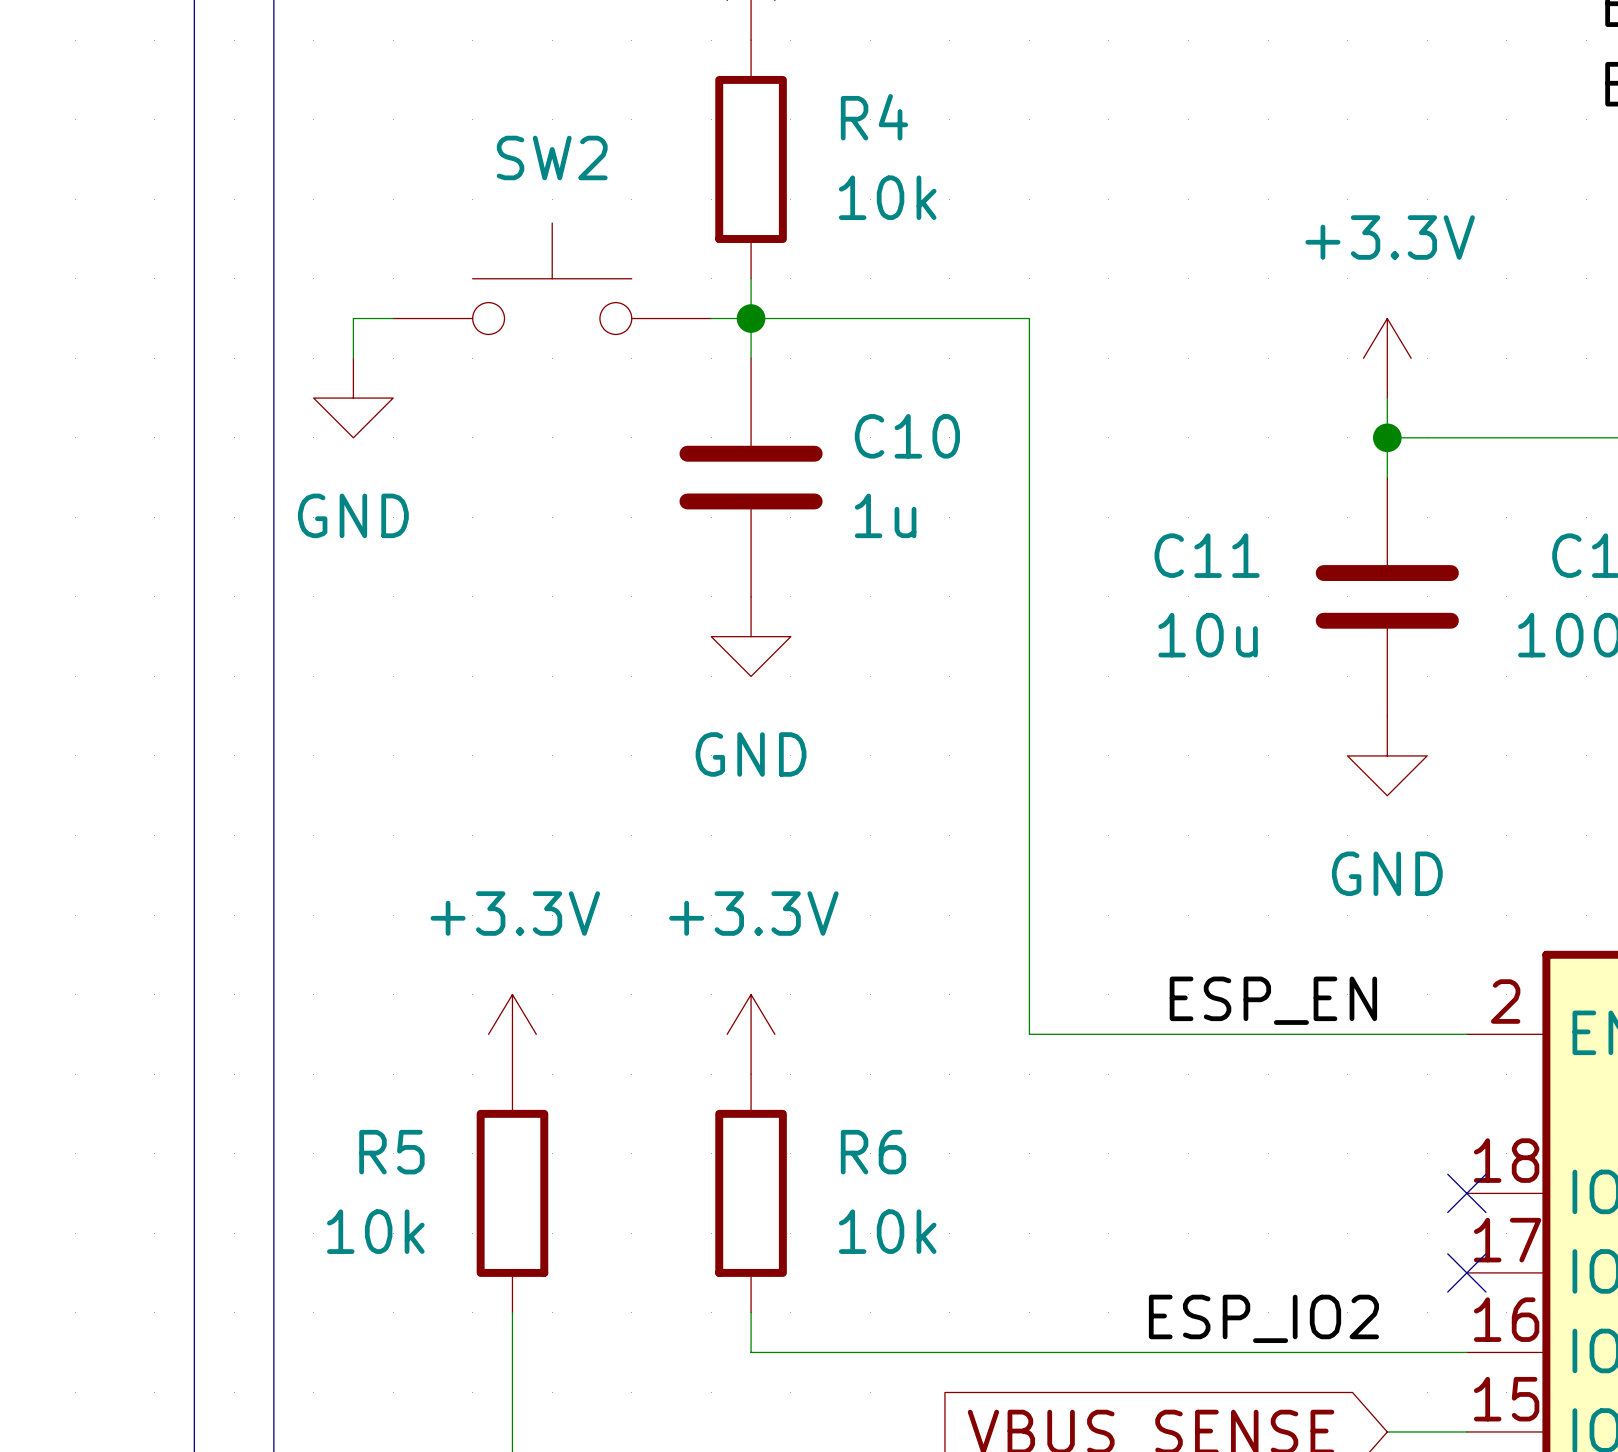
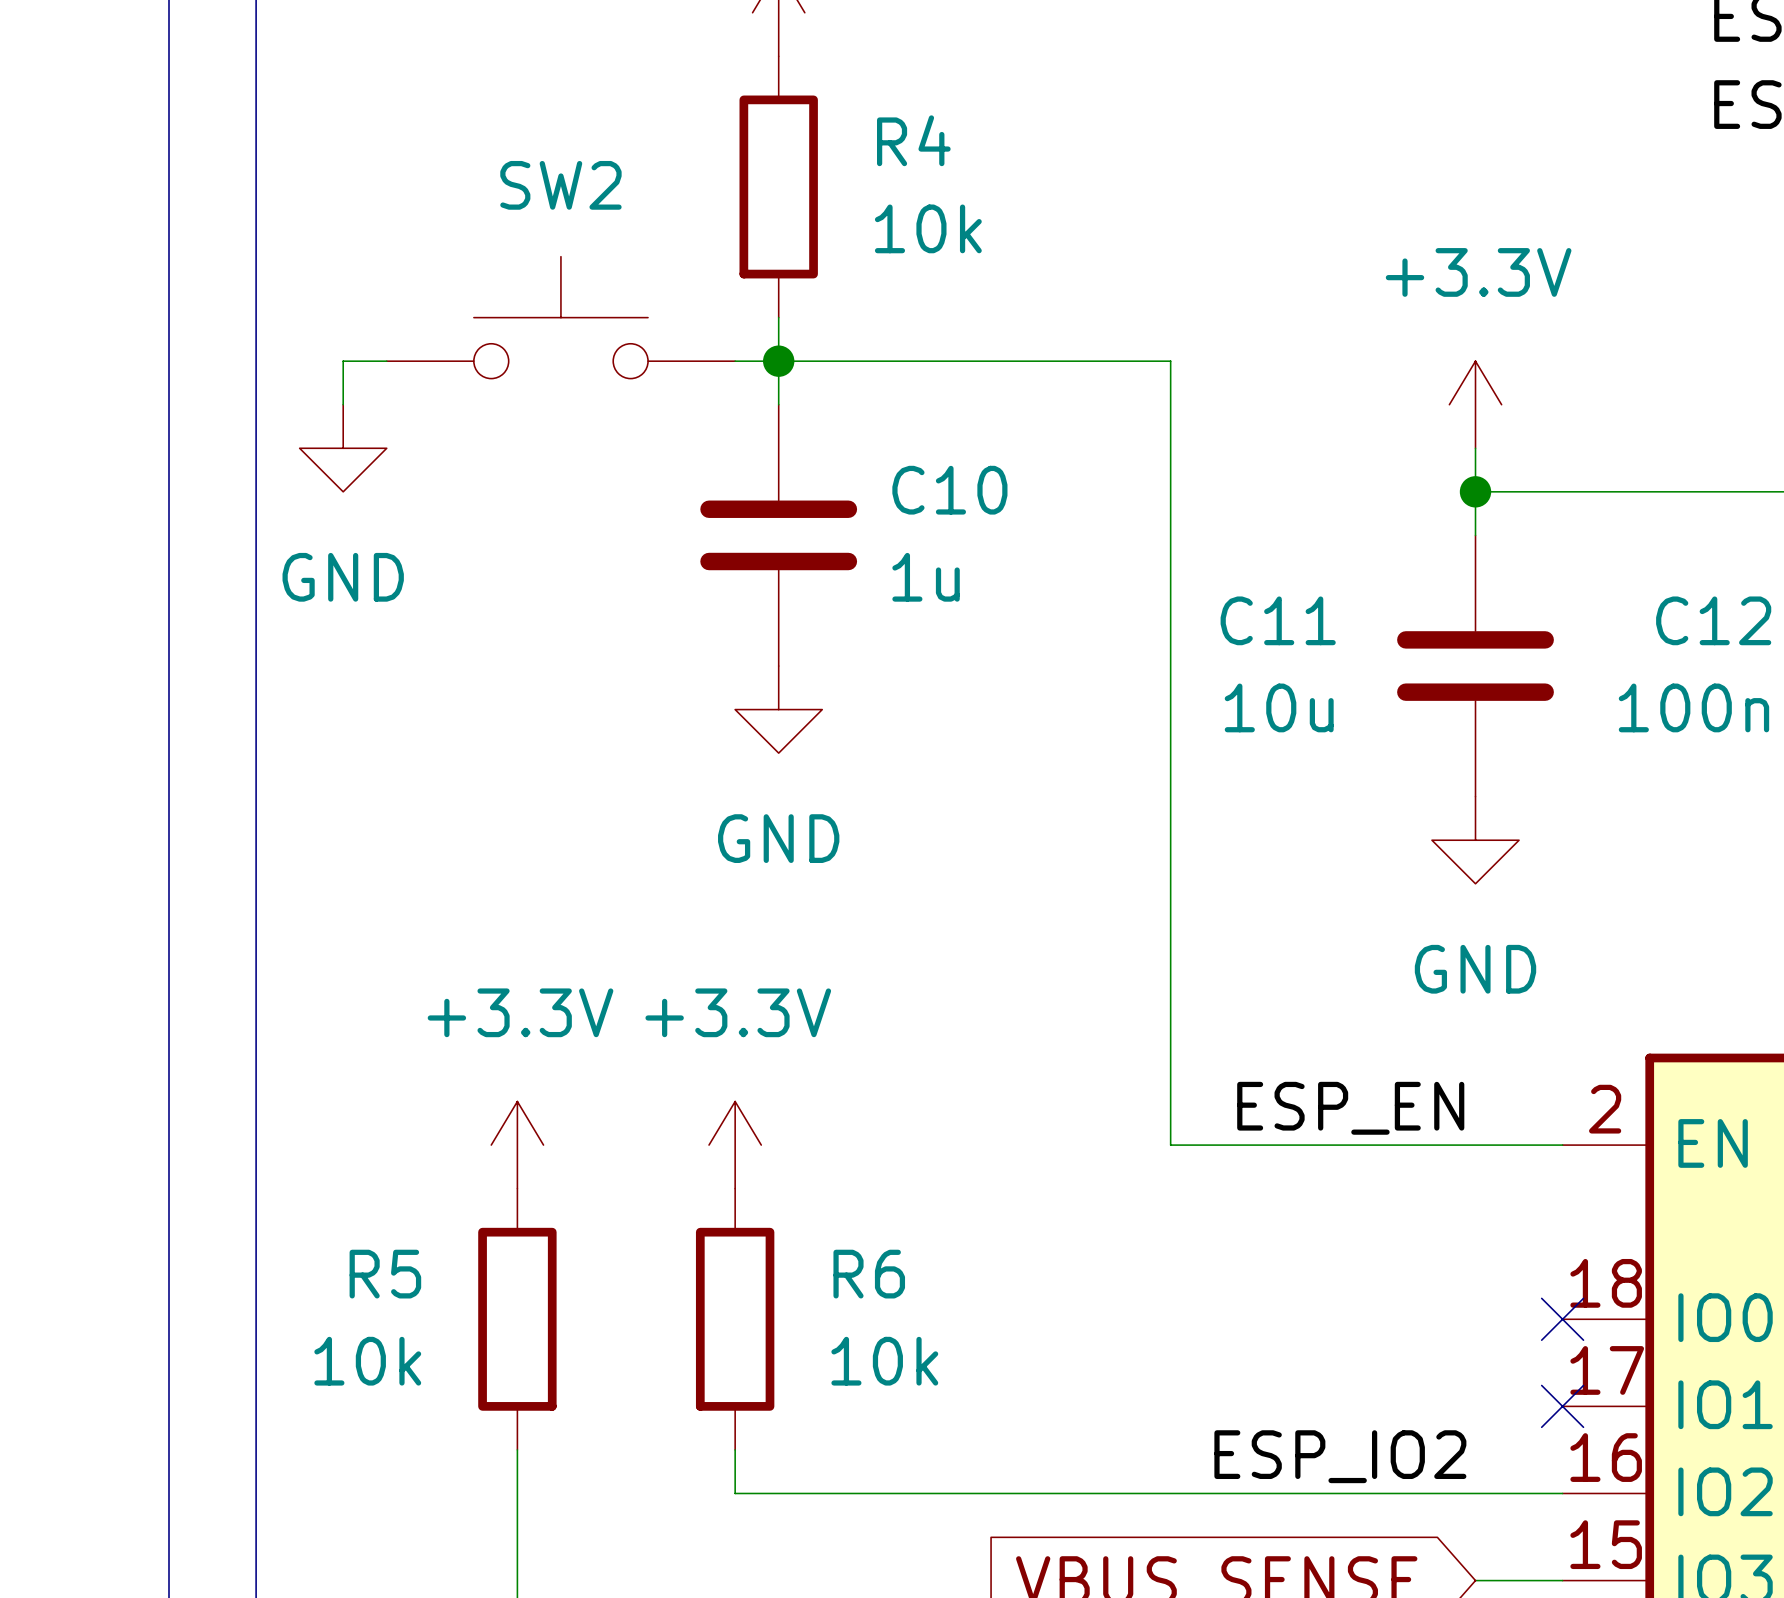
wire: (1029, 318) (1029, 1034) (1108, 1034) -> (1083, 361) (1170, 361) (1170, 1145)
power symbol position: +3.3V (751, 1034) -> +3.3V (735, 1145)
R6 position: (751, 1193) -> (735, 1319)
wire: (751, 1312) (751, 1352) -> (735, 1449) (735, 1493) (778, 1493)

